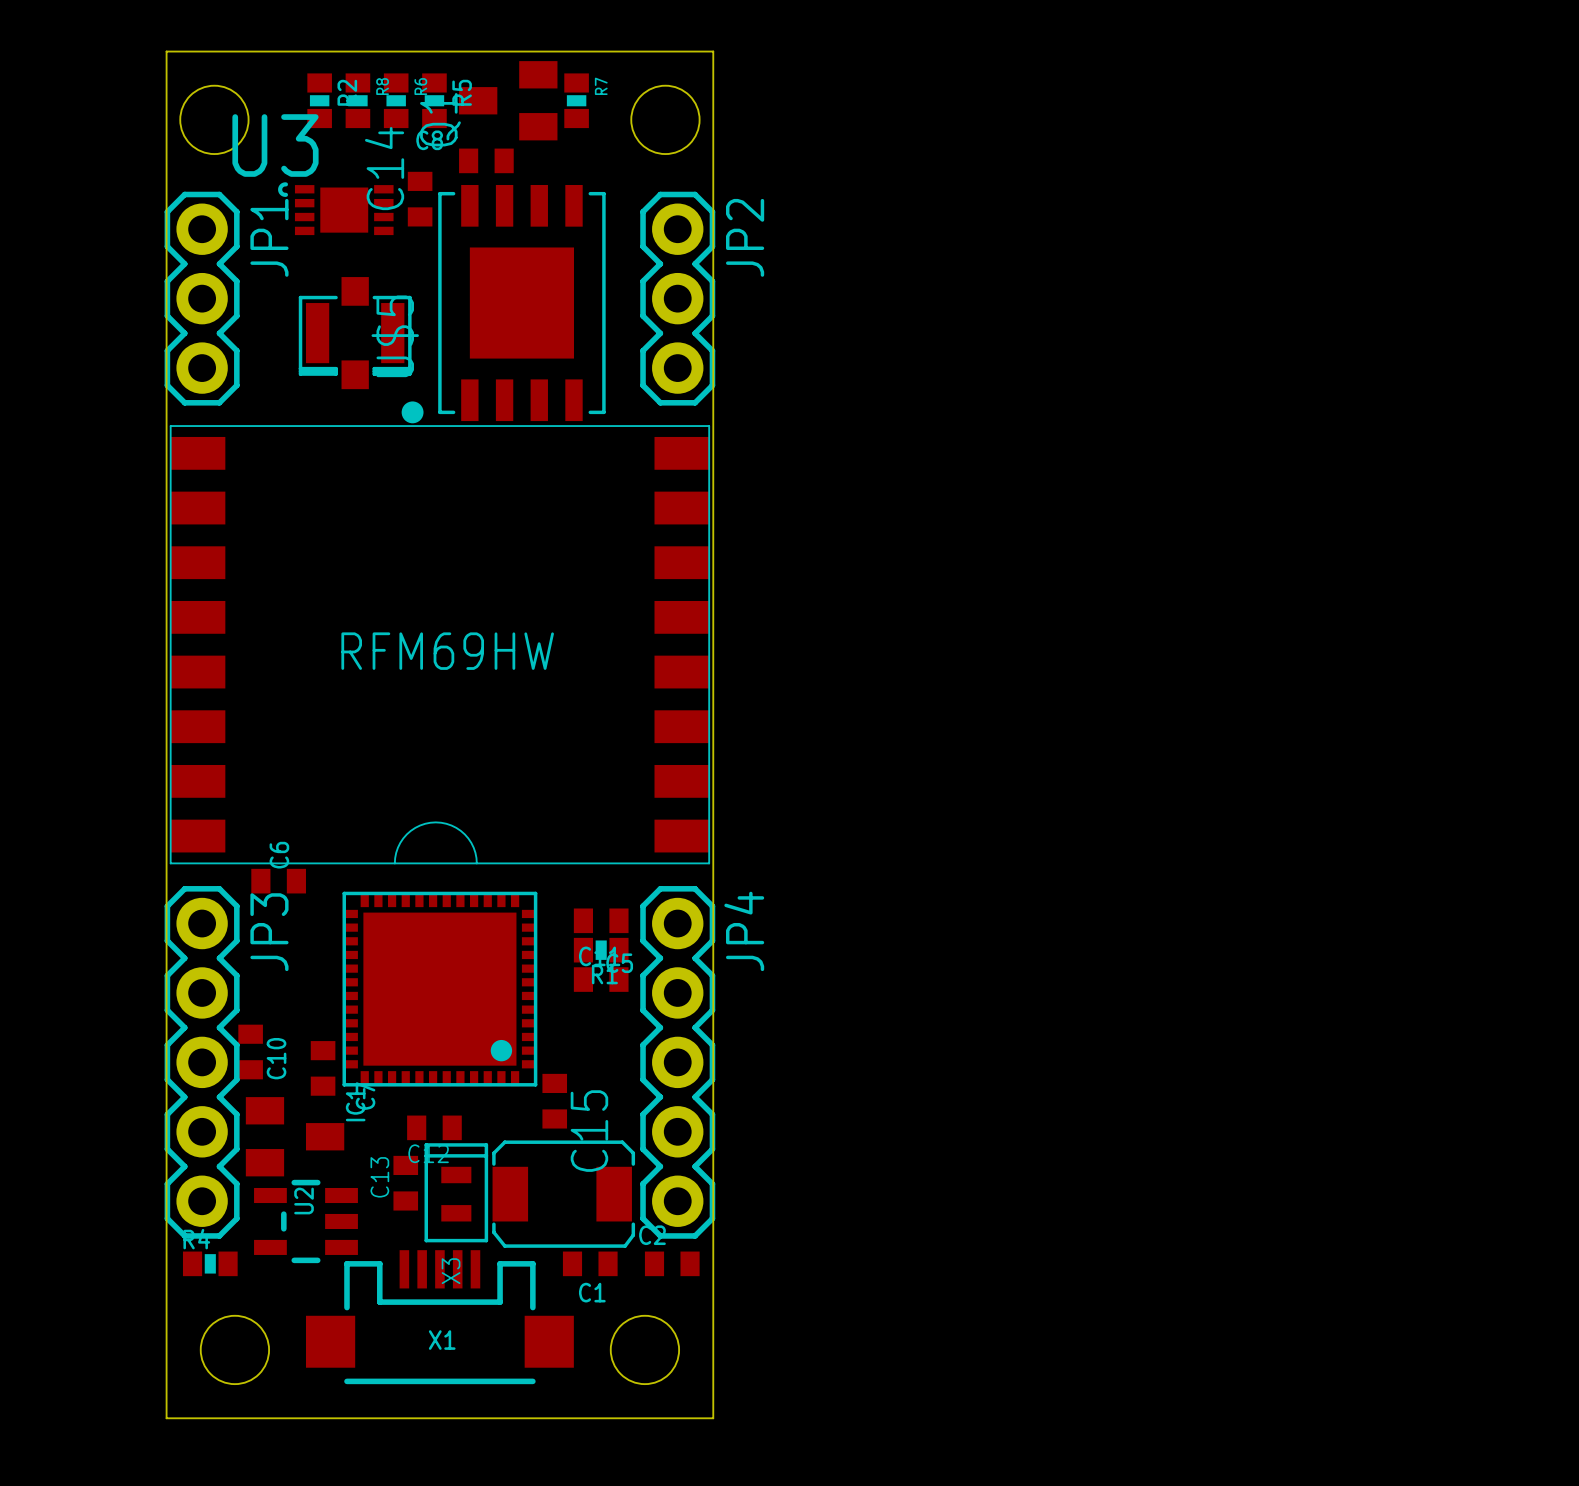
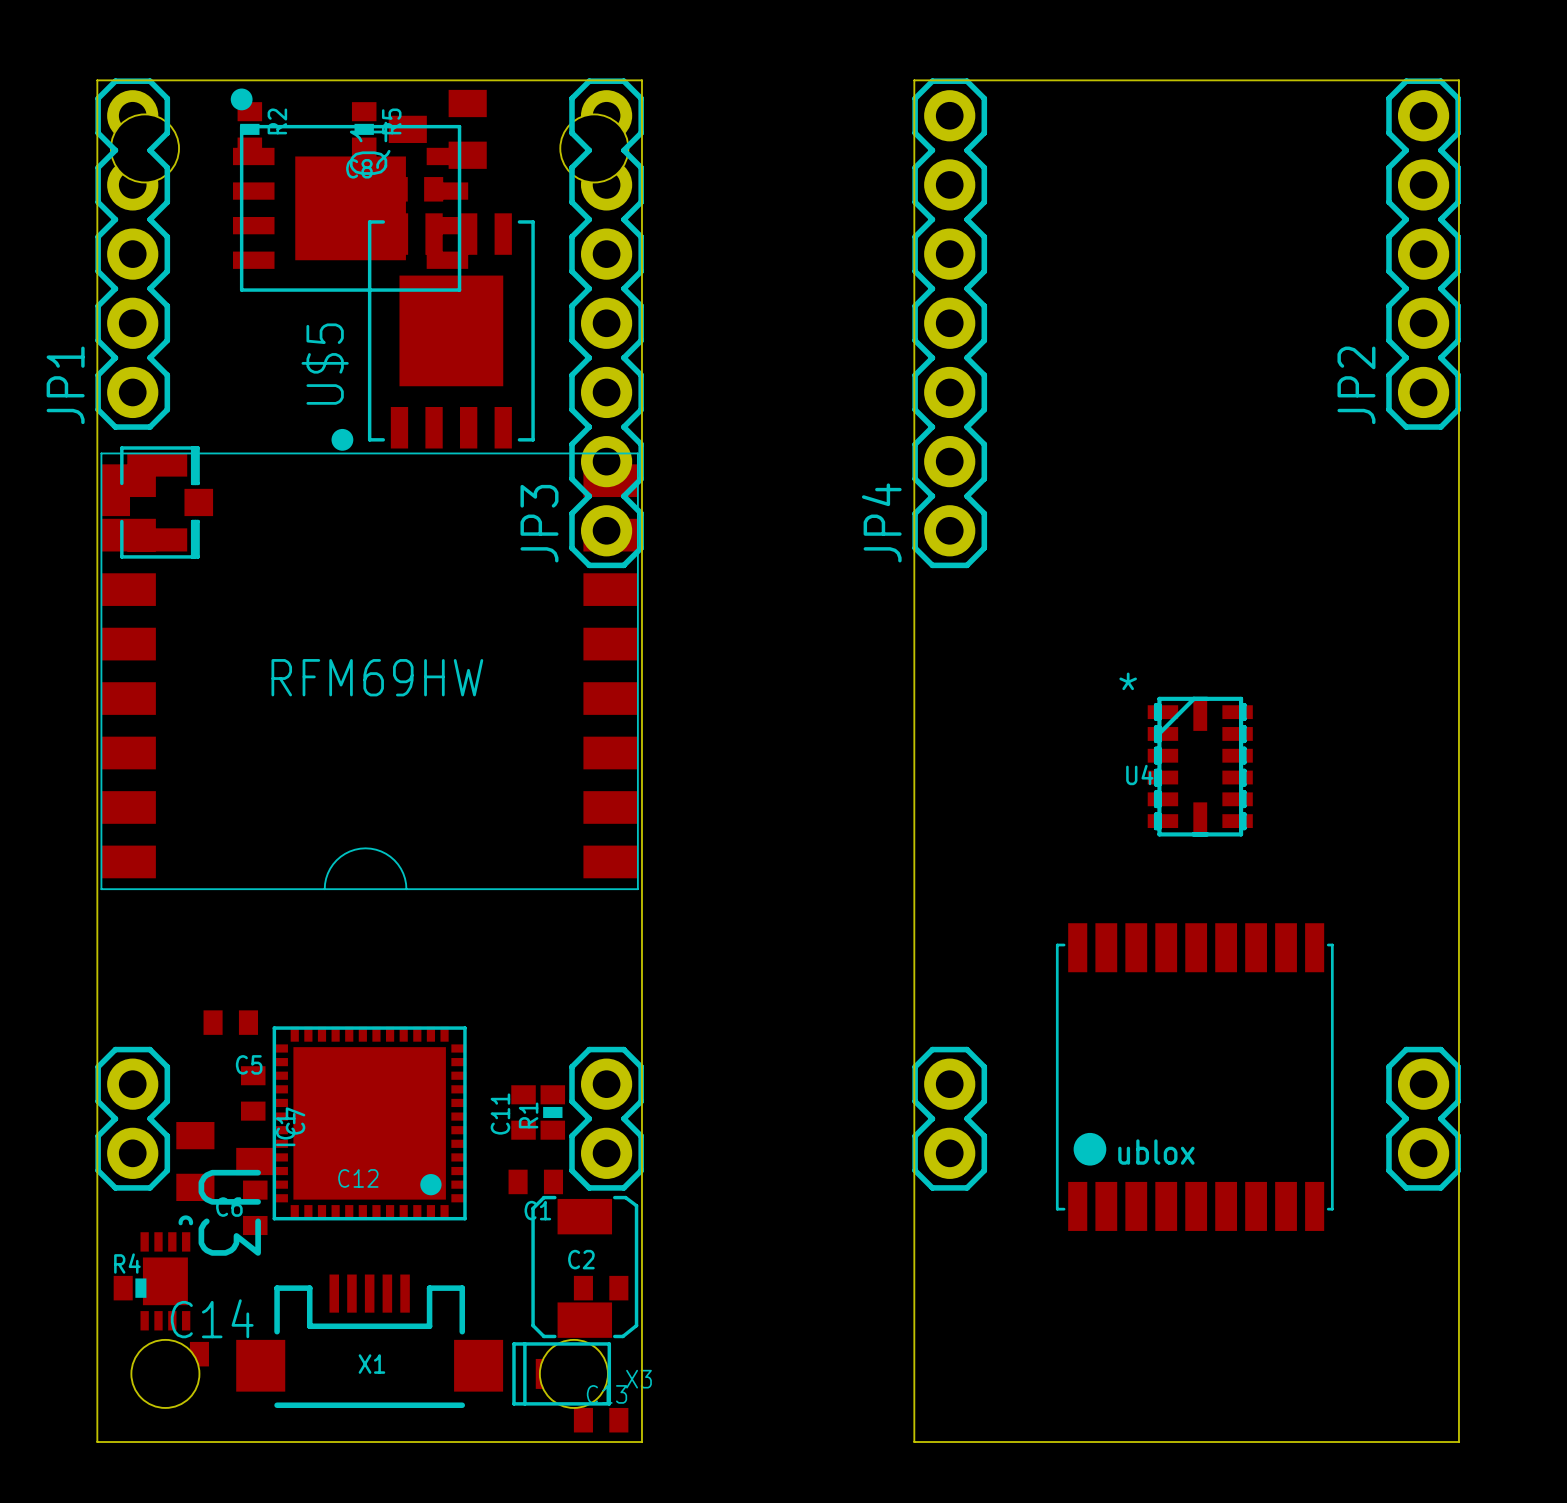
board edge: none -> (914, 80) (1458, 80) (1458, 1442) (914, 1442) (914, 80)
R8: (357, 100) -> none
R6: (396, 100) -> none
R7: (576, 100) -> none
part: none -> (349, 190)
JP1 footprint: [164, 191, 240, 406] -> [95, 78, 171, 430]
JP2 footprint: [640, 191, 716, 406] -> [1386, 78, 1461, 430]
C14 rotation: 0° (420, 199) -> 90° clockwise (181, 1354)
C14 position: (420, 199) -> (181, 1354)
U3 rotation: 0° (335, 208) -> 90° clockwise (166, 1272)
U3 position: (335, 208) -> (166, 1272)
JP1 name position: JP1 (269, 237) -> JP1 (65, 385)
JP2 name position: JP2 (745, 237) -> JP2 (1356, 385)
part rotation: 0° (355, 333) -> 90° counterclockwise (157, 502)
part position: (355, 333) -> (157, 502)
U4: none -> (1200, 766)
C6 rotation: 0° (278, 881) -> 90° clockwise (255, 1207)
C6 position: (278, 881) -> (255, 1207)
JP3 footprint: [164, 886, 240, 1239] -> [569, 78, 644, 569]
JP4 footprint: [640, 886, 716, 1239] -> [912, 78, 988, 569]
C5 position: (601, 920) -> (230, 1022)
JP4 name position: JP4 (744, 931) -> JP4 (881, 522)
JP3 name position: JP3 (269, 932) -> JP3 (539, 523)
R1 rotation: 0° (601, 950) -> 90° clockwise (552, 1112)
R1 position: (601, 950) -> (552, 1112)
C11 rotation: 0° (601, 979) -> 90° clockwise (523, 1112)
C11 position: (601, 979) -> (523, 1112)
part position: (439, 989) -> (369, 1123)
C10: (250, 1052) -> none
part: none -> (1194, 1077)
part: none -> (132, 1118)
part: none -> (606, 1118)
part: none -> (949, 1118)
part: none -> (1423, 1118)
C15: (554, 1101) -> none
C13 rotation: 0° (405, 1183) -> 90° clockwise (601, 1420)
C13 position: (405, 1183) -> (601, 1420)
X3 rotation: 0° (456, 1192) -> 90° counterclockwise (561, 1373)
X3 position: (456, 1192) -> (561, 1373)
part rotation: 0° (563, 1194) -> 90° counterclockwise (584, 1267)
part position: (563, 1194) -> (584, 1267)
U2: (305, 1221) -> none
C1 position: (590, 1263) -> (535, 1181)

